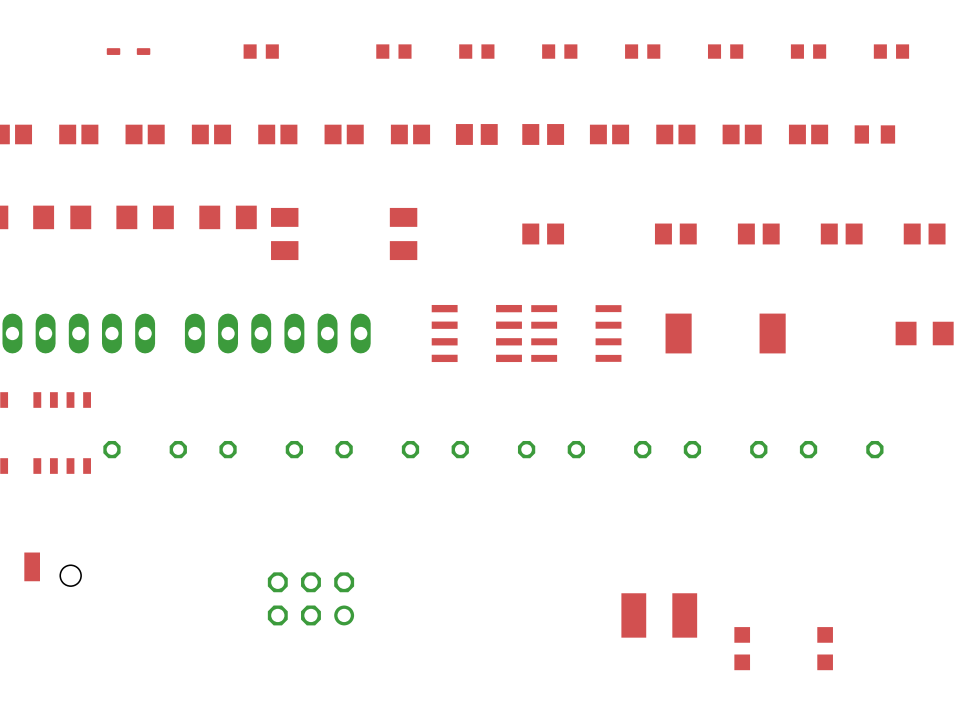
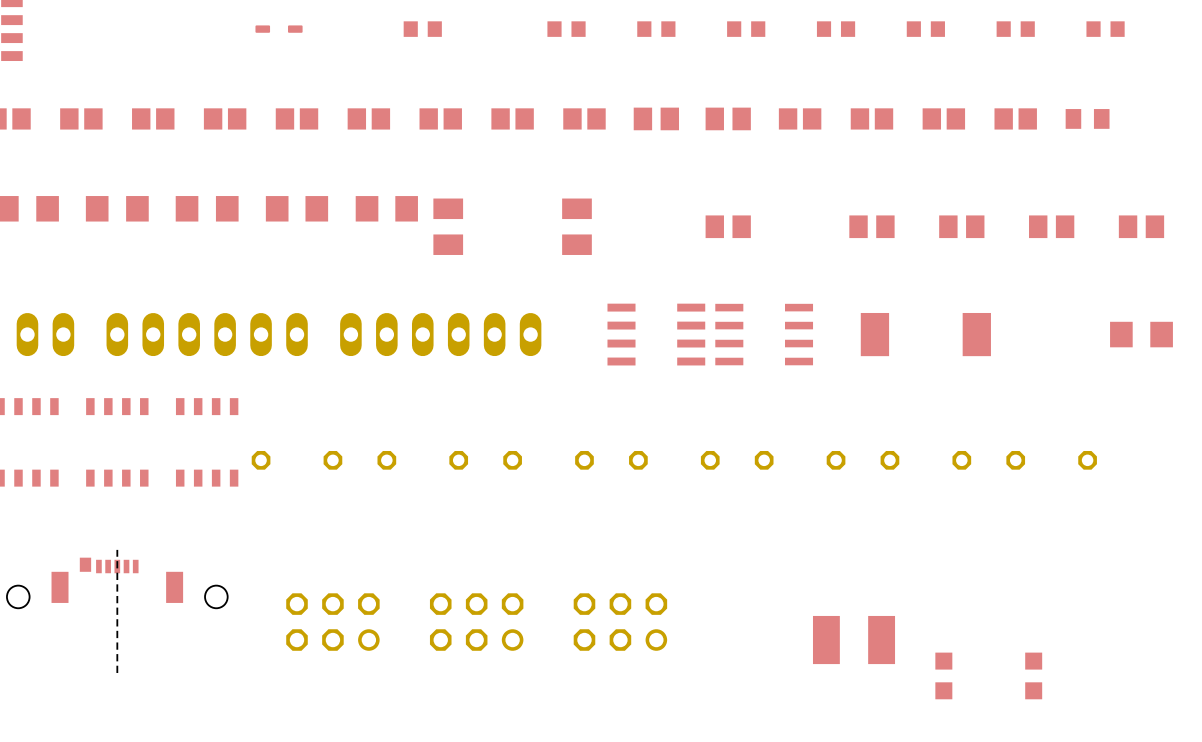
part: none -> (332, 622)
part: none -> (620, 622)

